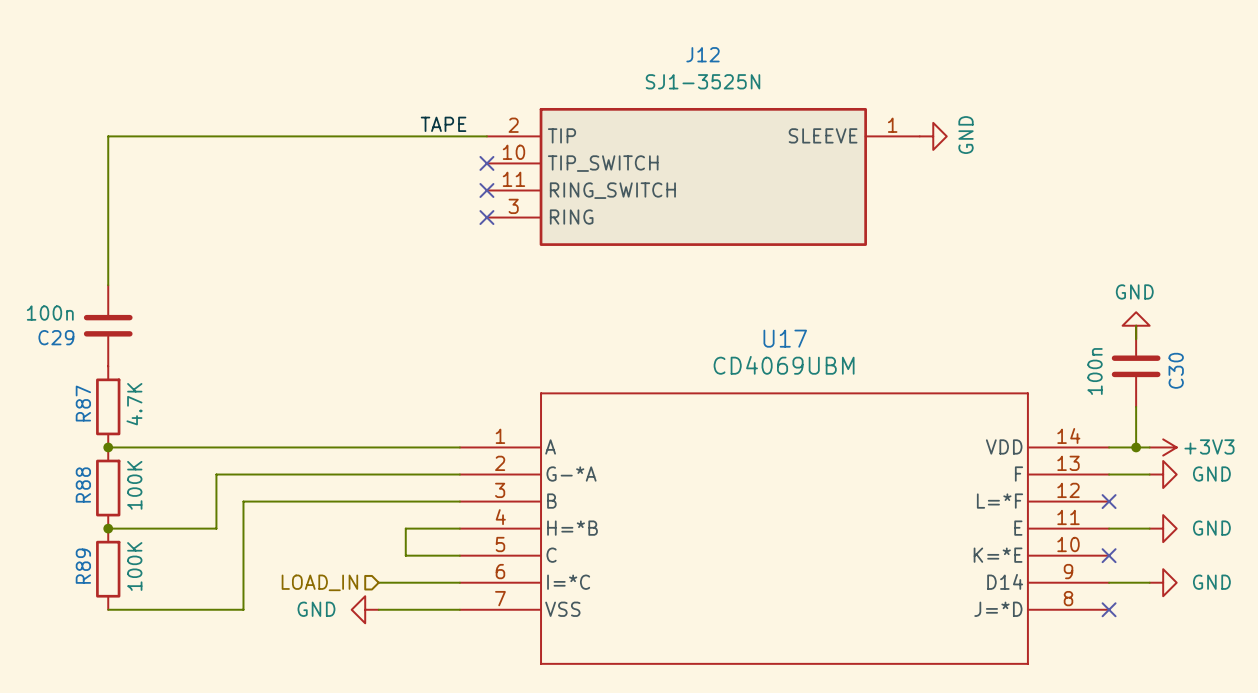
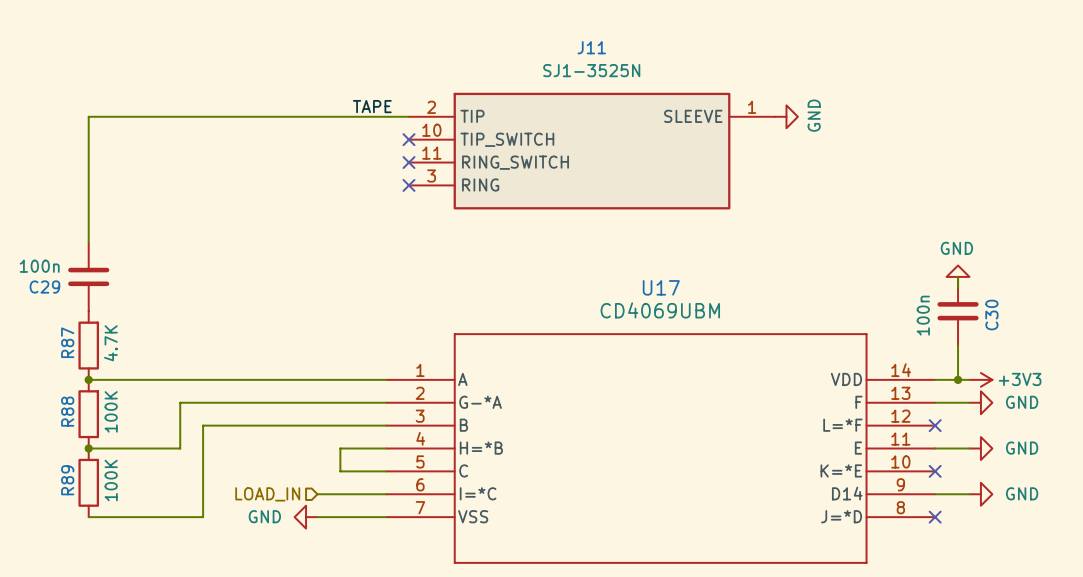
J12 name: J12 (703, 54) -> J11 (591, 47)

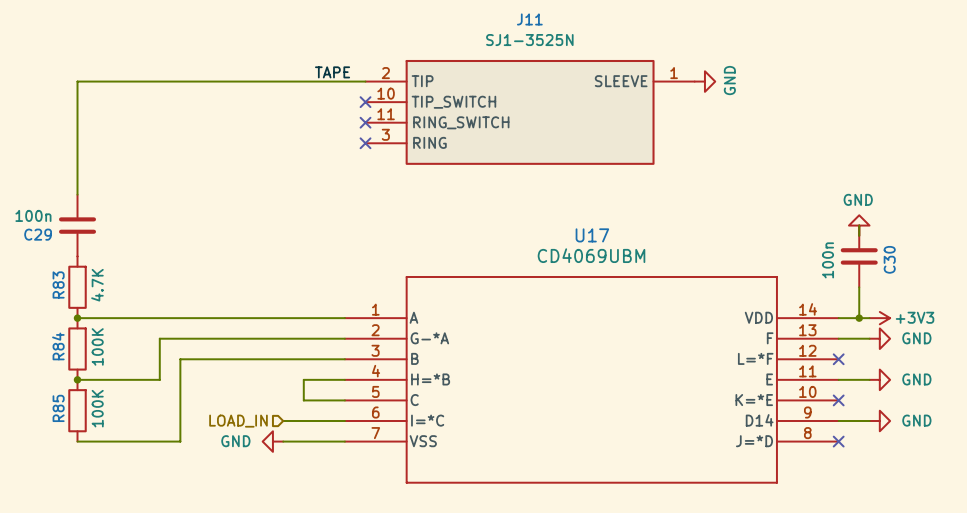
R87 name: R87 (67, 342) -> R83 (58, 284)
R88 name: R88 (67, 411) -> R84 (58, 346)
R89 name: R89 (67, 480) -> R85 (58, 408)

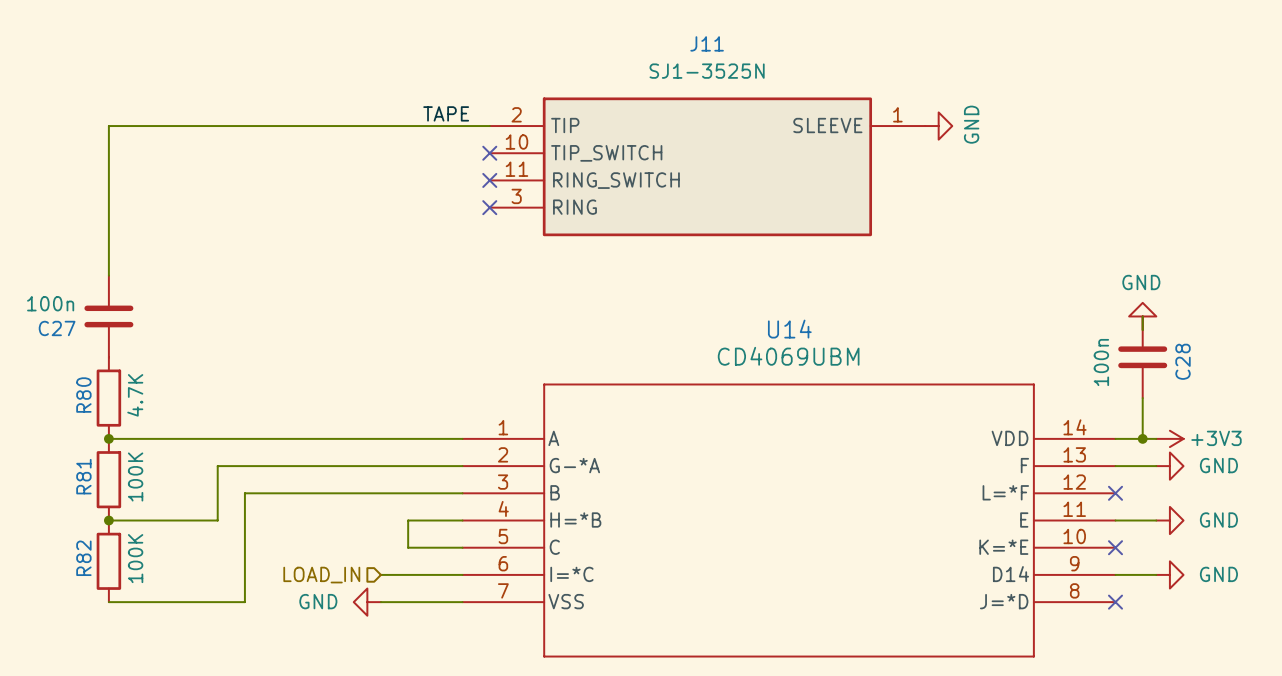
C29 name: C29 (38, 234) -> C27 (57, 328)
U17 name: U17 (592, 235) -> U14 (789, 329)
C30 name: C30 (889, 259) -> C28 (1183, 361)
R83 name: R83 (58, 284) -> R80 (83, 395)
R84 name: R84 (58, 346) -> R81 (83, 476)
R85 name: R85 (58, 408) -> R82 (83, 558)

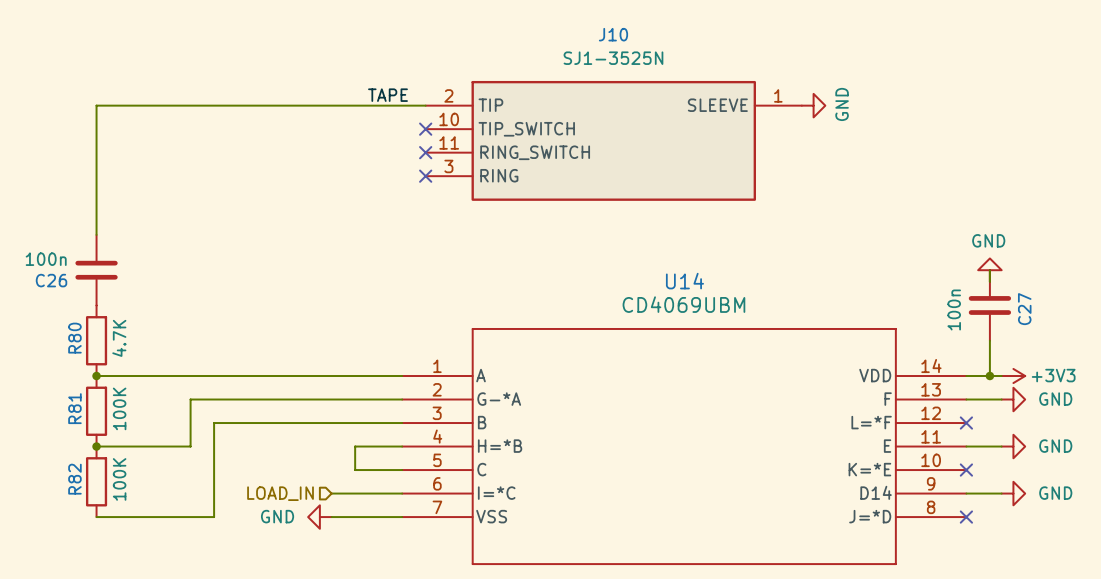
J11 name: J11 (707, 43) -> J10 (613, 34)
C27 name: C27 (57, 328) -> C26 (51, 280)
C28 name: C28 (1183, 361) -> C27 (1024, 309)

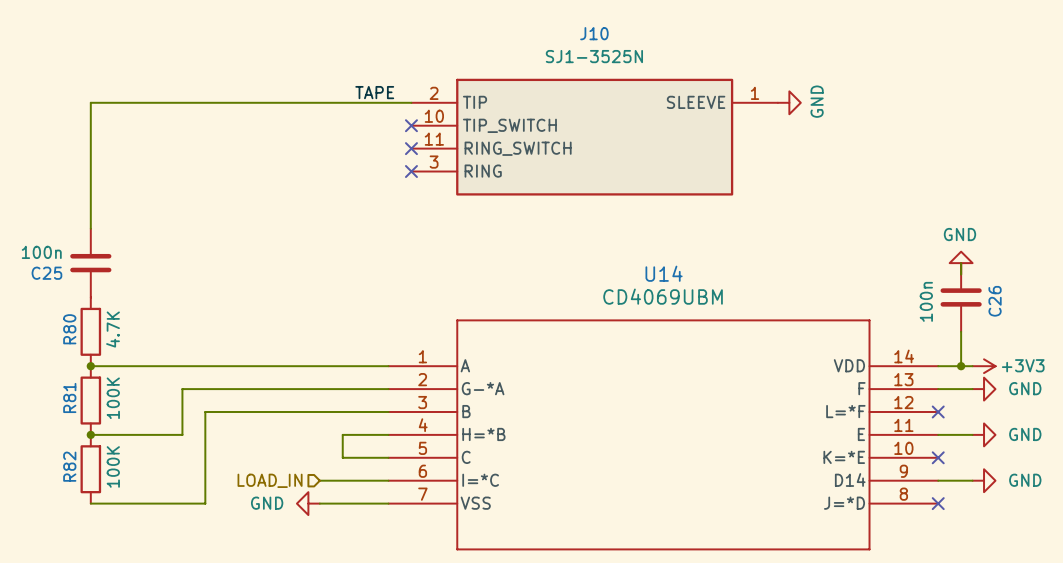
C26 name: C26 (51, 280) -> C25 (46, 273)
C27 name: C27 (1024, 309) -> C26 (995, 301)

